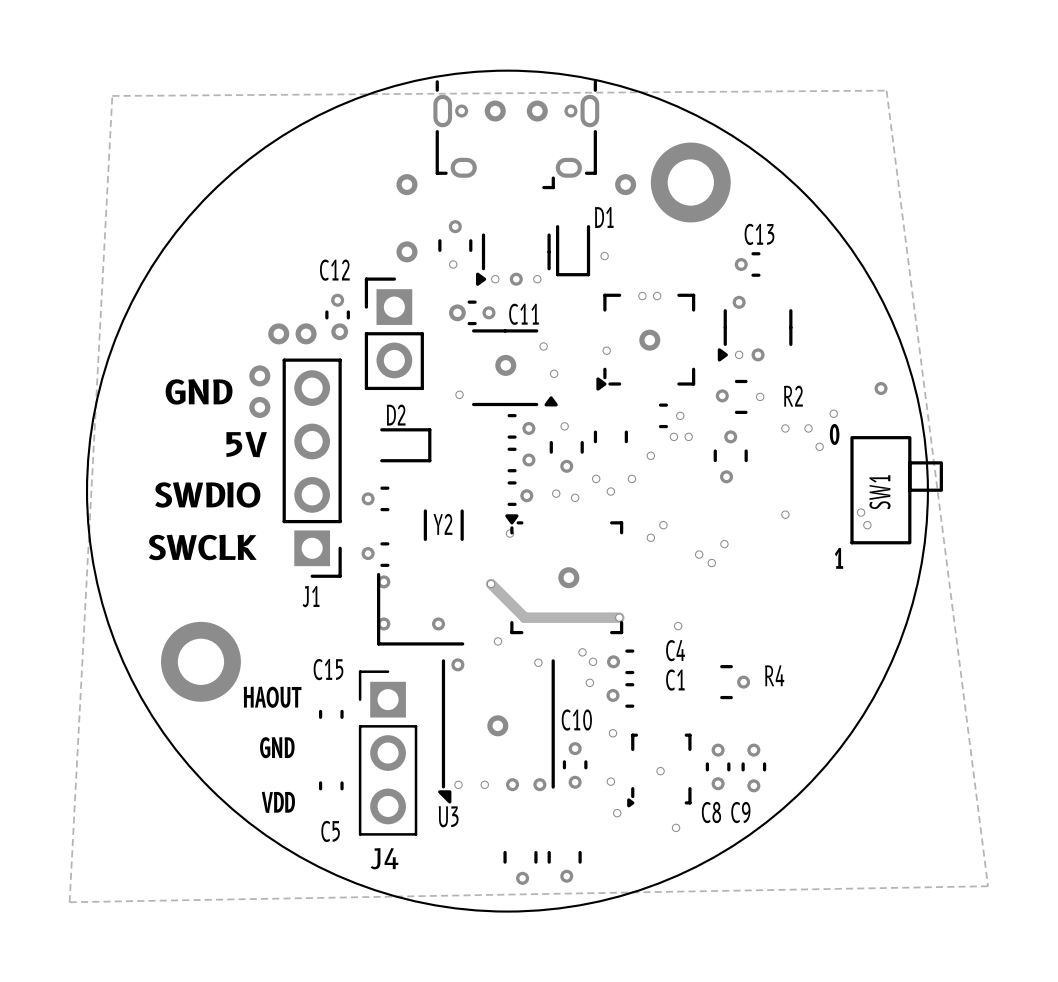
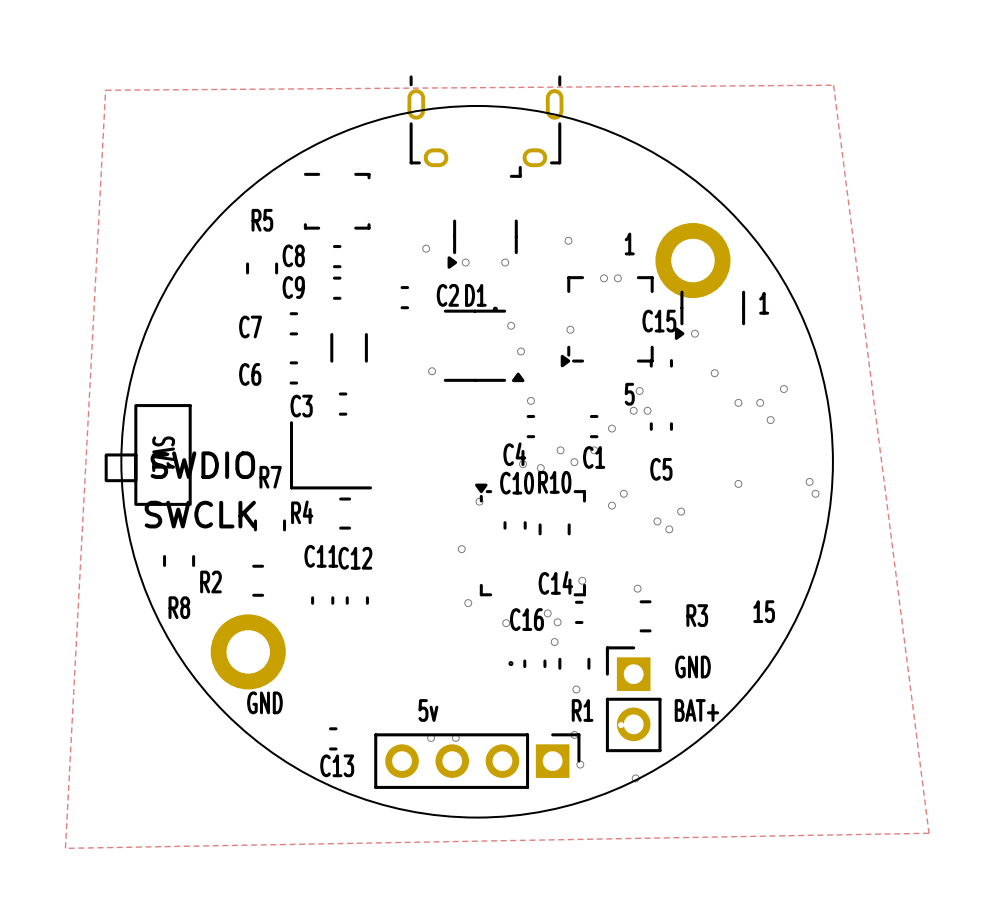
round board edge size: [85, 69, 929, 913] -> [120, 104, 834, 819]
via: (461, 111) -> none
via: (495, 111) -> none
via: (537, 111) -> none
via: (570, 111) -> none
part position: (690, 182) -> (692, 260)
via: (406, 184) -> none
via: (625, 184) -> none
part: none -> (337, 201)
D1 name position: D1 (604, 217) -> D1 (475, 295)
D1 footprint: [555, 225, 591, 277] -> [492, 306, 498, 312]
via: (455, 226) -> none
C13 name position: C13 (759, 234) -> C13 (337, 765)
part: (455, 245) -> none
via: (406, 251) -> none
text: none -> 1 (629, 244)
via: (741, 264) -> none
C13 position: (755, 264) -> (333, 738)
via: (516, 279) -> none
R5: none -> (262, 268)
via: (337, 300) -> none
via: (739, 302) -> none
via: (457, 312) -> none
C11 rotation: 0° (472, 312) -> 90° clockwise (322, 600)
C11 position: (472, 312) -> (322, 600)
via: (488, 312) -> none
C12 position: (337, 314) -> (357, 600)
C11 name position: C11 (524, 314) -> C11 (321, 556)
C2: none -> (404, 297)
text: none -> 1 (764, 303)
via: (339, 331) -> none
via: (278, 333) -> none
via: (306, 333) -> none
part position: (394, 333) -> (633, 699)
via: (649, 340) -> none
C7: none -> (293, 323)
via: (758, 354) -> none
via: (505, 365) -> none
part: none -> (349, 347)
via: (259, 375) -> none
via: (881, 388) -> none
text: GND (199, 391) -> none
via: (722, 395) -> none
C6: none -> (293, 372)
R2 position: (741, 396) -> (258, 580)
R2 name position: R2 (793, 396) -> R2 (210, 582)
via: (259, 407) -> none
part: (663, 415) -> none
text: none -> 5 (629, 394)
part: (512, 426) -> none
via: (528, 428) -> none
C3: none -> (343, 404)
text: 0 (834, 434) -> none
part: (610, 436) -> none
via: (730, 436) -> none
text: 5V (246, 444) -> none
D2: (405, 445) -> none
part: (566, 447) -> none
part: (730, 455) -> none
part: (512, 460) -> none
via: (528, 460) -> none
via: (566, 466) -> none
J1: (312, 468) -> none
via: (726, 476) -> none
SW1 rotation: 0° (896, 490) -> 180° (148, 454)
SW1 position: (896, 490) -> (148, 454)
part: (512, 493) -> none
via: (526, 495) -> none
via: (368, 498) -> none
part: (384, 498) -> none
Y2: (443, 525) -> none
via: (368, 553) -> none
part: (384, 554) -> none
R7: none -> (270, 525)
text: 1 (839, 558) -> none
R10: none -> (554, 529)
via: (568, 577) -> none
via: (383, 581) -> none
track: (491, 584) (524, 617) (619, 617) -> none
R8: none -> (179, 560)
part position: (420, 609) -> (331, 455)
via: (383, 623) -> none
via: (438, 623) -> none
C4 name position: C4 (675, 650) -> C4 (514, 454)
text: none -> 15 (764, 611)
C14: none -> (579, 612)
R3: none -> (645, 616)
part position: (200, 661) -> (248, 651)
via: (613, 661) -> none
C4 position: (629, 661) -> (530, 426)
via: (457, 664) -> none
R4 name position: R4 (774, 675) -> R4 (302, 512)
C1 name position: C1 (675, 680) -> C1 (594, 457)
R4 position: (726, 682) -> (345, 513)
via: (743, 682) -> none
via: (613, 695) -> none
C1 position: (629, 695) -> (594, 426)
text: HAOUT (272, 697) -> none
part: none -> (510, 663)
C16: none -> (534, 663)
R1: none -> (574, 663)
text: none -> GND (692, 666)
C15 position: (331, 714) -> (661, 363)
via: (497, 725) -> none
U3: (496, 731) -> none
via: (575, 748) -> none
via: (718, 750) -> none
via: (753, 750) -> none
J4: (388, 753) -> none
text: none -> 5v (428, 710)
text: none -> BAT+ (696, 710)
C10 position: (575, 764) -> (515, 525)
C8 rotation: 0° (718, 766) -> 90° clockwise (337, 256)
C8 position: (718, 766) -> (337, 256)
C9 rotation: 0° (753, 766) -> 90° clockwise (337, 288)
C9 position: (753, 766) -> (337, 288)
part: (659, 770) -> none
via: (575, 782) -> none
via: (718, 783) -> none
via: (512, 784) -> none
via: (539, 784) -> none
C5 position: (331, 785) -> (661, 426)
via: (753, 785) -> none
text: VDD (278, 802) -> none
part: none -> (477, 761)
part: (520, 857) -> none
part: (564, 857) -> none
via: (566, 876) -> none
via: (522, 878) -> none

